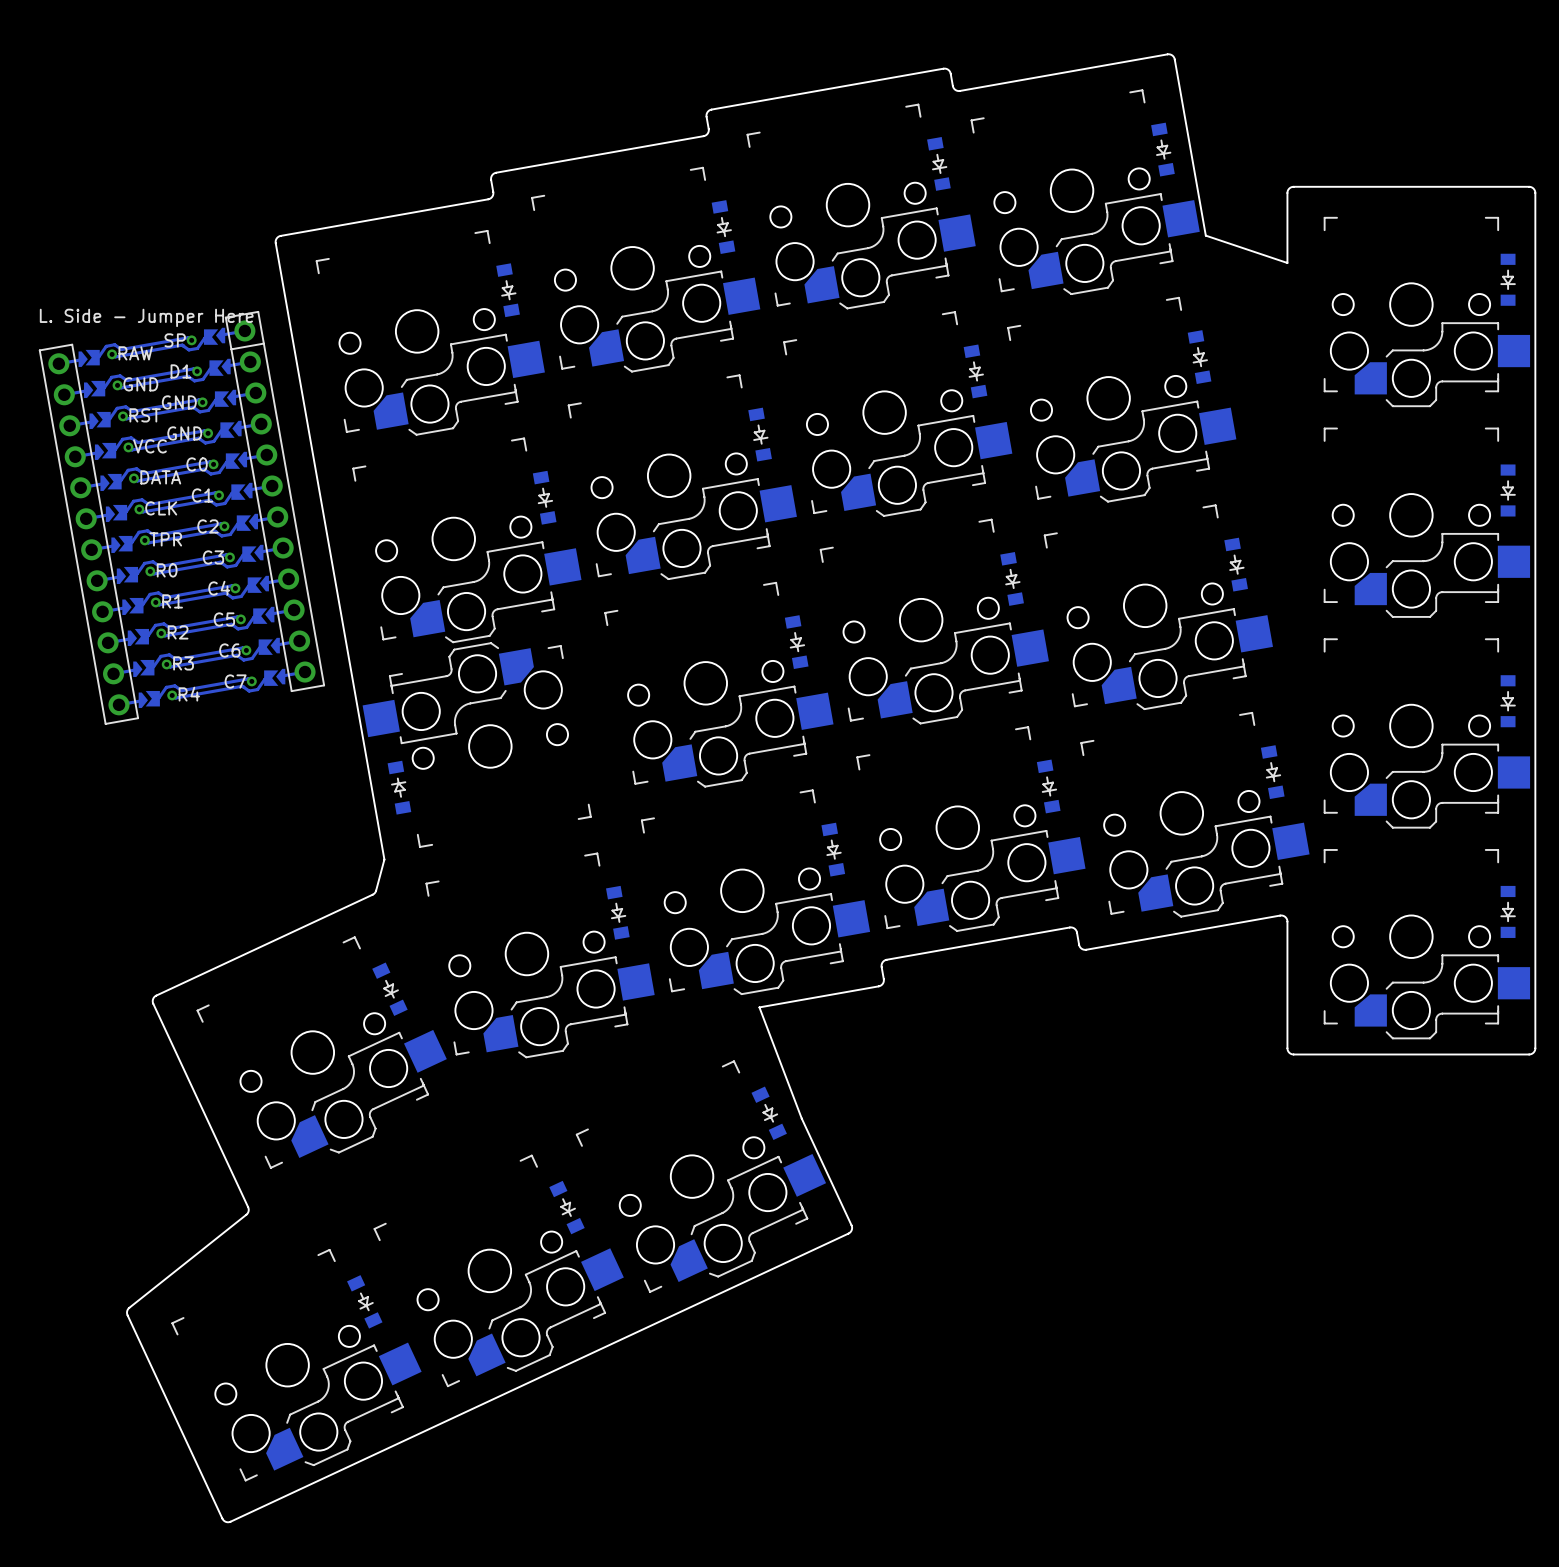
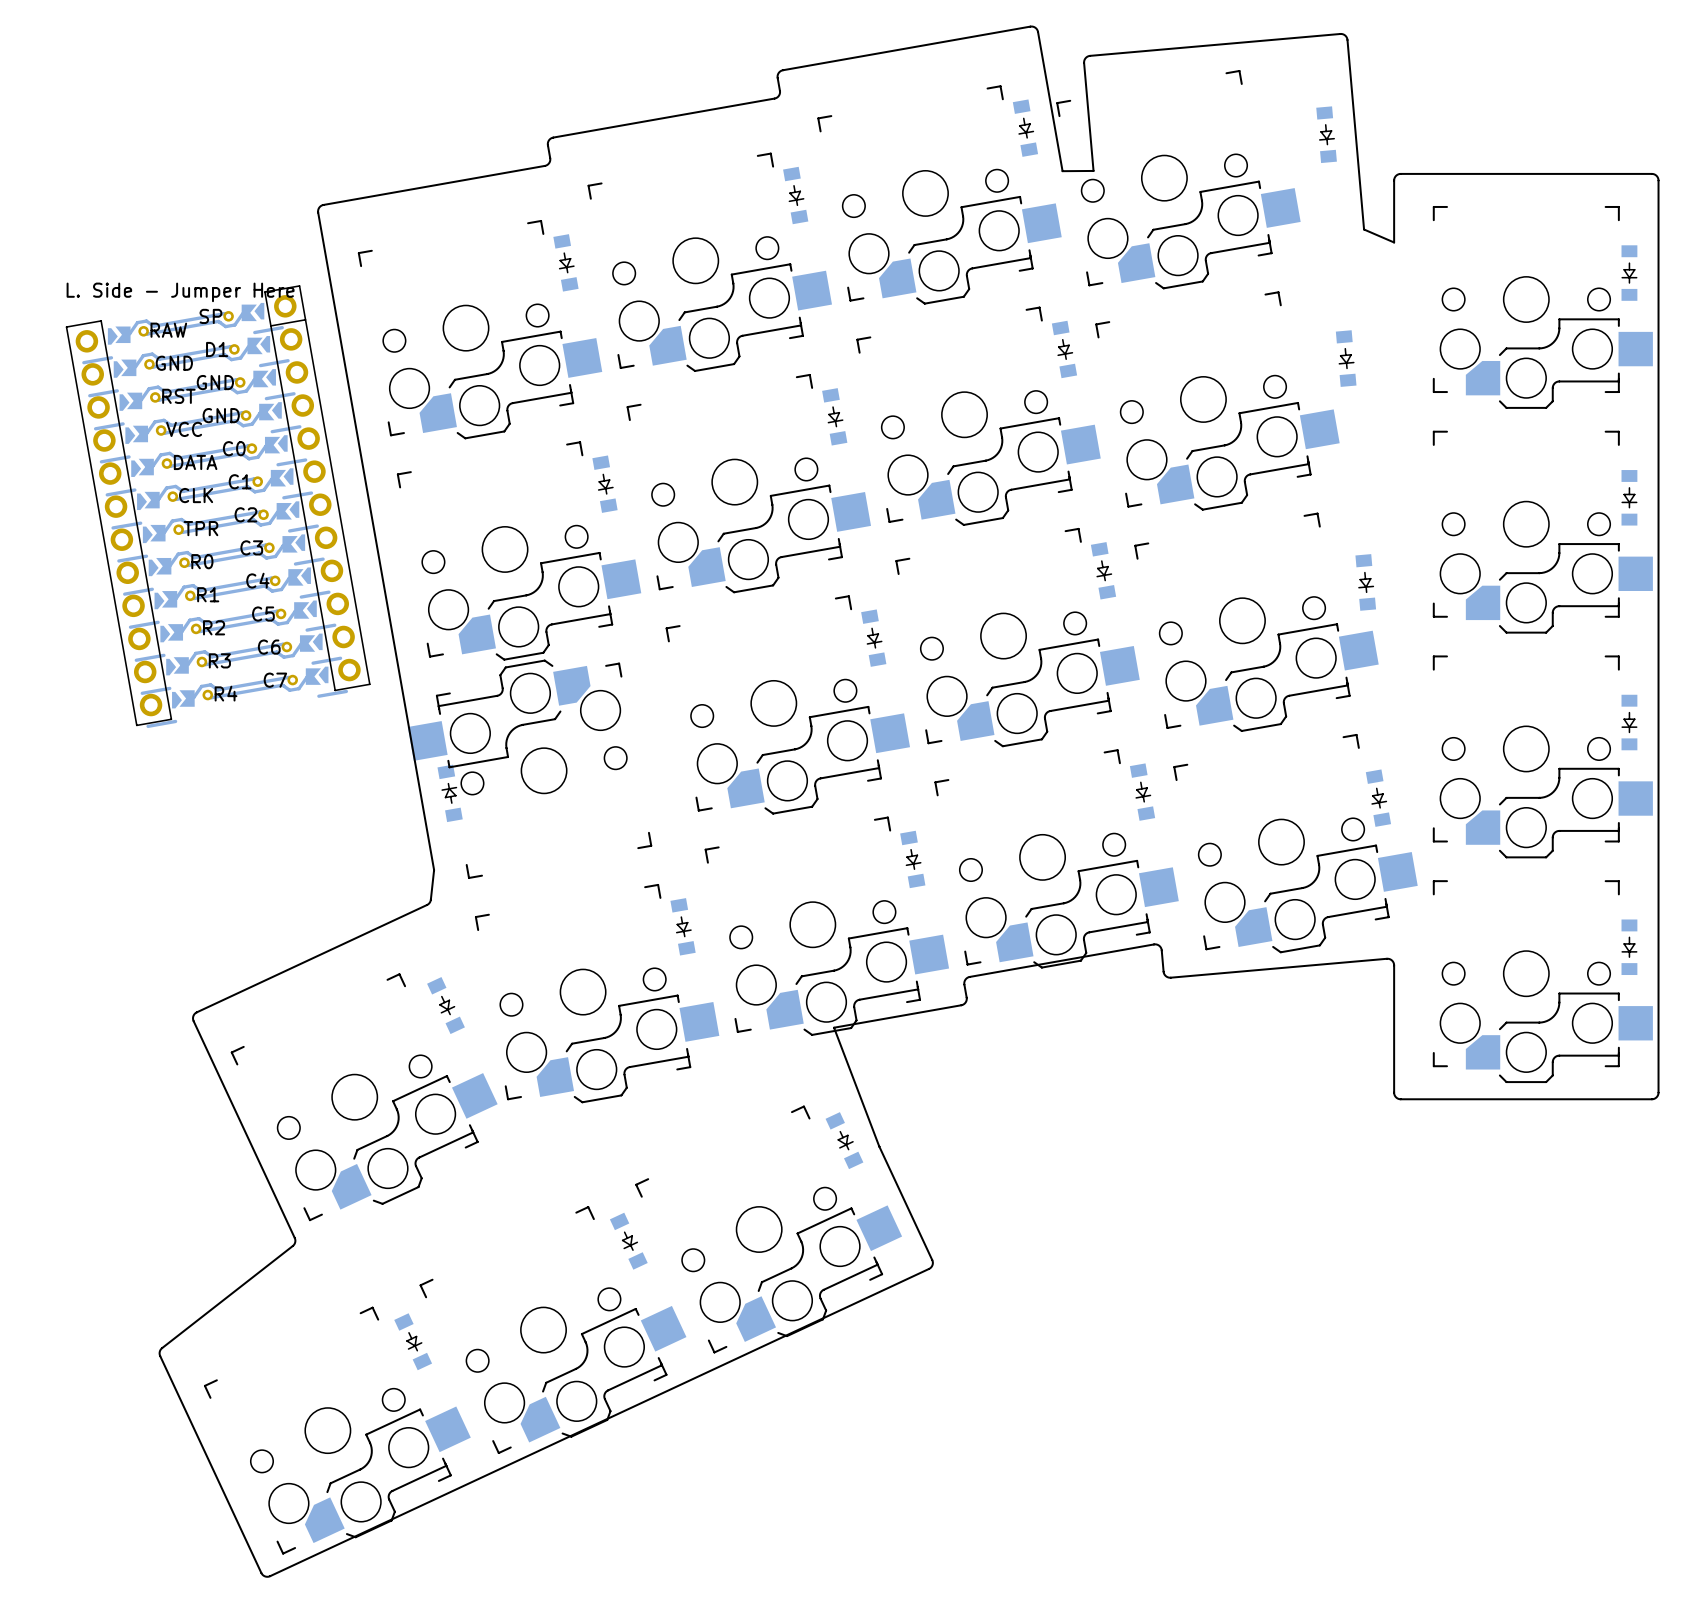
part: (1162, 149) -> none
part: none -> (1326, 134)
part position: (938, 163) -> (1025, 128)
part position: (723, 227) -> (795, 195)
board edge: (1287, 251) (1287, 263) (1205, 235) (1174, 59) (1168, 54) (959, 91) (953, 87) (949, 71) (943, 68) (711, 109) (706, 114) (708, 130) (704, 135) (496, 172) (491, 177) (493, 193) (488, 199) (277, 237) (275, 243) (384, 859) (376, 890) (373, 894) (153, 998) (153, 1003) (248, 1210) (246, 1214) (129, 1307) (127, 1314) (222, 1518) (225, 1521) (229, 1521) (850, 1232) (851, 1225) (801, 1118) (759, 1007) (880, 985) (883, 980) (881, 964) (885, 959) (1069, 927) (1076, 930) (1079, 946) (1084, 949) (1280, 915) (1286, 918) (1287, 928) -> (1394, 242) (1364, 229) (1347, 39) (1345, 36) (1341, 33) (1087, 56) (1084, 63) (1093, 170) (1062, 171) (1038, 31) (1035, 27) (1031, 26) (782, 70) (777, 76) (779, 93) (775, 98) (553, 137) (547, 142) (550, 159) (545, 165) (323, 204) (318, 208) (434, 870) (430, 900) (427, 904) (196, 1012) (193, 1016) (295, 1241) (292, 1246) (162, 1348) (159, 1353) (262, 1574) (270, 1576) (929, 1268) (932, 1264) (932, 1260) (879, 1146)
part position: (508, 290) -> (565, 262)
track: none -> (228, 316) (224, 313) (153, 326) (146, 321) (137, 322) (129, 333) (123, 334)
track: (210, 337) (204, 338) (197, 348) (188, 349) (183, 346) -> (259, 378) (254, 380) (246, 391) (237, 392) (231, 388)
track: (191, 340) (188, 337) (121, 349) (114, 344) (106, 346) (98, 356) (93, 357) -> (240, 382) (236, 379) (165, 392) (158, 387) (149, 388) (141, 399) (135, 400)
track: (183, 345) (115, 356) (112, 354) -> (231, 388) (159, 400) (155, 397)
part: (1199, 357) -> none
part: none -> (1346, 358)
track: (215, 368) (210, 369) (202, 379) (194, 380) (189, 377) -> (248, 312) (242, 313) (234, 325) (225, 326) (219, 322)
track: (197, 371) (193, 368) (126, 380) (120, 375) (111, 377) (104, 387) (99, 388) -> (246, 415) (242, 412) (171, 425) (163, 420) (154, 421) (147, 433) (141, 433)
part position: (975, 371) -> (1064, 349)
track: (189, 377) (121, 387) (117, 385) -> (225, 355) (153, 367) (149, 364)
track: (221, 399) (215, 400) (208, 410) (199, 411) (194, 408) -> (271, 445) (265, 446) (258, 457) (249, 458) (243, 454)
track: (202, 402) (198, 399) (132, 411) (125, 406) (117, 408) (109, 418) (104, 419) -> (251, 448) (248, 445) (177, 458) (169, 453) (160, 454) (152, 466) (147, 466)
track: (194, 408) (126, 418) (123, 416) -> (243, 454) (170, 466) (166, 463)
track: (226, 430) (221, 431) (213, 441) (205, 443) (199, 439) -> (277, 478) (271, 479) (263, 490) (254, 491) (249, 487)
track: (208, 433) (204, 430) (138, 442) (131, 437) (122, 439) (115, 449) (109, 450) -> (257, 481) (253, 479) (182, 491) (175, 486) (166, 488) (158, 499) (153, 500)
part position: (760, 434) -> (834, 416)
track: (199, 439) (132, 449) (128, 447) -> (249, 487) (176, 499) (172, 496)
track: (232, 461) (226, 462) (219, 472) (210, 474) (205, 470) -> (283, 511) (277, 512) (269, 523) (260, 525) (254, 520)
track: (213, 464) (210, 461) (143, 473) (136, 468) (128, 470) (120, 480) (115, 481) -> (263, 514) (259, 512) (188, 524) (181, 519) (172, 521) (164, 532) (158, 533)
track: (205, 470) (137, 480) (133, 478) -> (254, 520) (182, 532) (178, 529)
track: (237, 492) (232, 493) (224, 503) (216, 505) (210, 501) -> (289, 544) (283, 545) (275, 556) (266, 558) (260, 553)
track: (219, 495) (215, 492) (148, 504) (142, 499) (133, 501) (126, 511) (120, 512) -> (269, 547) (265, 545) (194, 557) (187, 552) (178, 554) (170, 565) (164, 566)
part position: (544, 497) -> (605, 484)
track: (210, 501) (142, 511) (139, 509) -> (260, 553) (188, 565) (184, 562)
part position: (181, 517) -> (218, 505)
track: (242, 523) (237, 524) (230, 534) (221, 535) (216, 532) -> (294, 577) (289, 578) (281, 589) (272, 591) (266, 587)
track: (224, 526) (220, 523) (154, 535) (147, 530) (139, 532) (131, 542) (126, 543) -> (275, 580) (271, 578) (200, 590) (193, 585) (184, 587) (176, 598) (170, 599)
track: (216, 532) (148, 542) (144, 540) -> (266, 586) (194, 598) (190, 595)
track: (248, 554) (243, 555) (235, 565) (227, 566) (221, 563) -> (300, 610) (295, 611) (287, 622) (278, 624) (272, 620)
track: (229, 557) (226, 554) (159, 566) (153, 561) (144, 563) (137, 573) (131, 574) -> (281, 613) (277, 611) (206, 623) (198, 618) (189, 620) (182, 631) (176, 632)
track: (221, 563) (153, 573) (150, 571) -> (272, 619) (199, 631) (196, 628)
part: (1236, 564) -> none
part: none -> (1365, 582)
part position: (1012, 578) -> (1103, 570)
track: (253, 585) (248, 586) (241, 596) (232, 597) (227, 594) -> (254, 345) (248, 346) (240, 358) (231, 359) (225, 355)
track: (235, 588) (231, 585) (165, 597) (158, 592) (150, 594) (142, 604) (137, 605) -> (286, 647) (283, 644) (212, 656) (204, 651) (195, 653) (188, 664) (182, 665)
track: (227, 594) (159, 604) (155, 602) -> (219, 322) (147, 334) (143, 331)
track: (259, 616) (254, 617) (246, 627) (238, 628) (232, 625) -> (312, 676) (306, 677) (298, 688) (289, 690) (284, 686)
track: (240, 619) (237, 616) (170, 628) (163, 623) (155, 625) (148, 635) (142, 636) -> (292, 680) (288, 677) (217, 689) (210, 684) (201, 686) (193, 697) (188, 698)
track: (232, 625) (164, 635) (161, 633) -> (284, 686) (211, 697) (207, 695)
track: none -> (306, 643) (300, 644) (293, 655) (283, 657) (276, 652) (205, 664) (201, 661)
part position: (796, 642) -> (873, 638)
track: (264, 647) (259, 648) (252, 658) (243, 660) (238, 656) -> none
track: (246, 650) (242, 647) (176, 659) (169, 654) (160, 656) (153, 666) (148, 667) -> (234, 349) (230, 346) (159, 359) (152, 354) (143, 355) (135, 366) (129, 367)
track: (238, 656) (170, 667) (166, 664) -> none
track: (270, 678) (264, 679) (257, 689) (249, 691) (243, 687) -> (265, 412) (260, 413) (252, 424) (243, 425) (237, 421)
track: (251, 681) (248, 678) (181, 690) (174, 685) (166, 687) (159, 697) (153, 698) -> none
track: (243, 687) (175, 697) (172, 695) -> (237, 421) (165, 433) (161, 430)
part position: (1048, 786) -> (1142, 792)
part position: (399, 787) -> (450, 793)
part position: (833, 849) -> (912, 859)
part position: (617, 912) -> (683, 926)
board edge: none -> (1394, 965) (1391, 960) (1386, 958) (1169, 977) (1163, 973) (1161, 948) (1154, 944) (968, 977) (964, 982) (966, 999) (962, 1004) (834, 1027) (879, 1146)
part position: (389, 989) -> (446, 1005)
part position: (769, 1113) -> (844, 1140)
part position: (566, 1207) -> (628, 1241)
part position: (364, 1301) -> (413, 1341)

